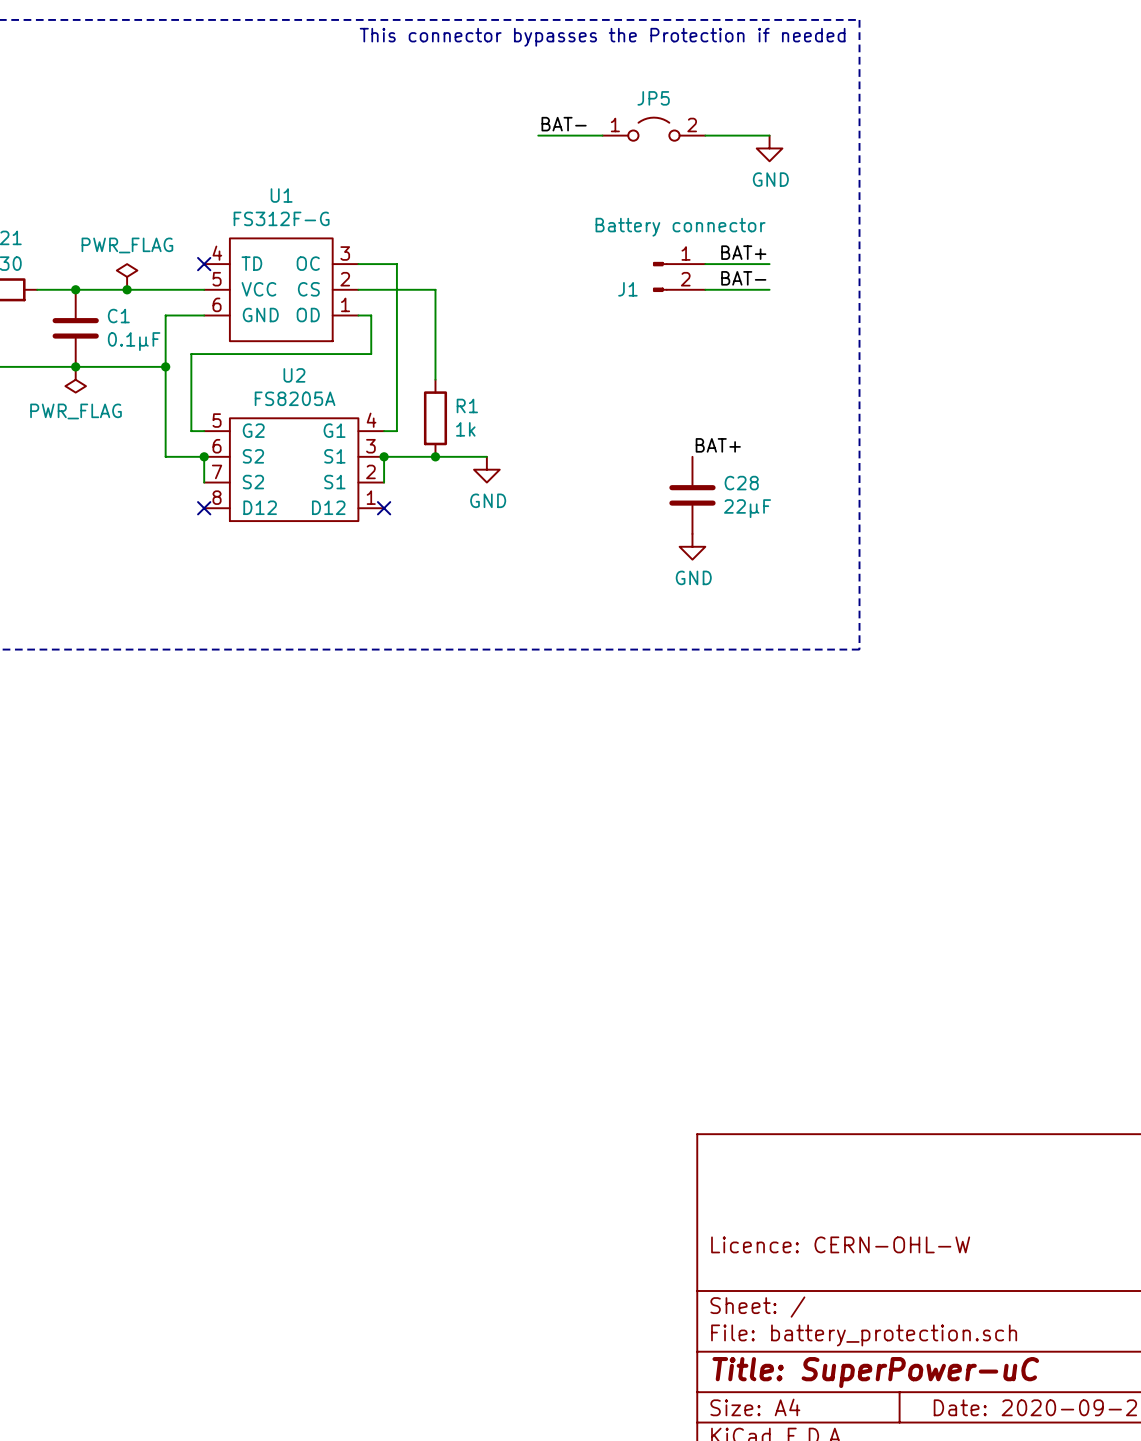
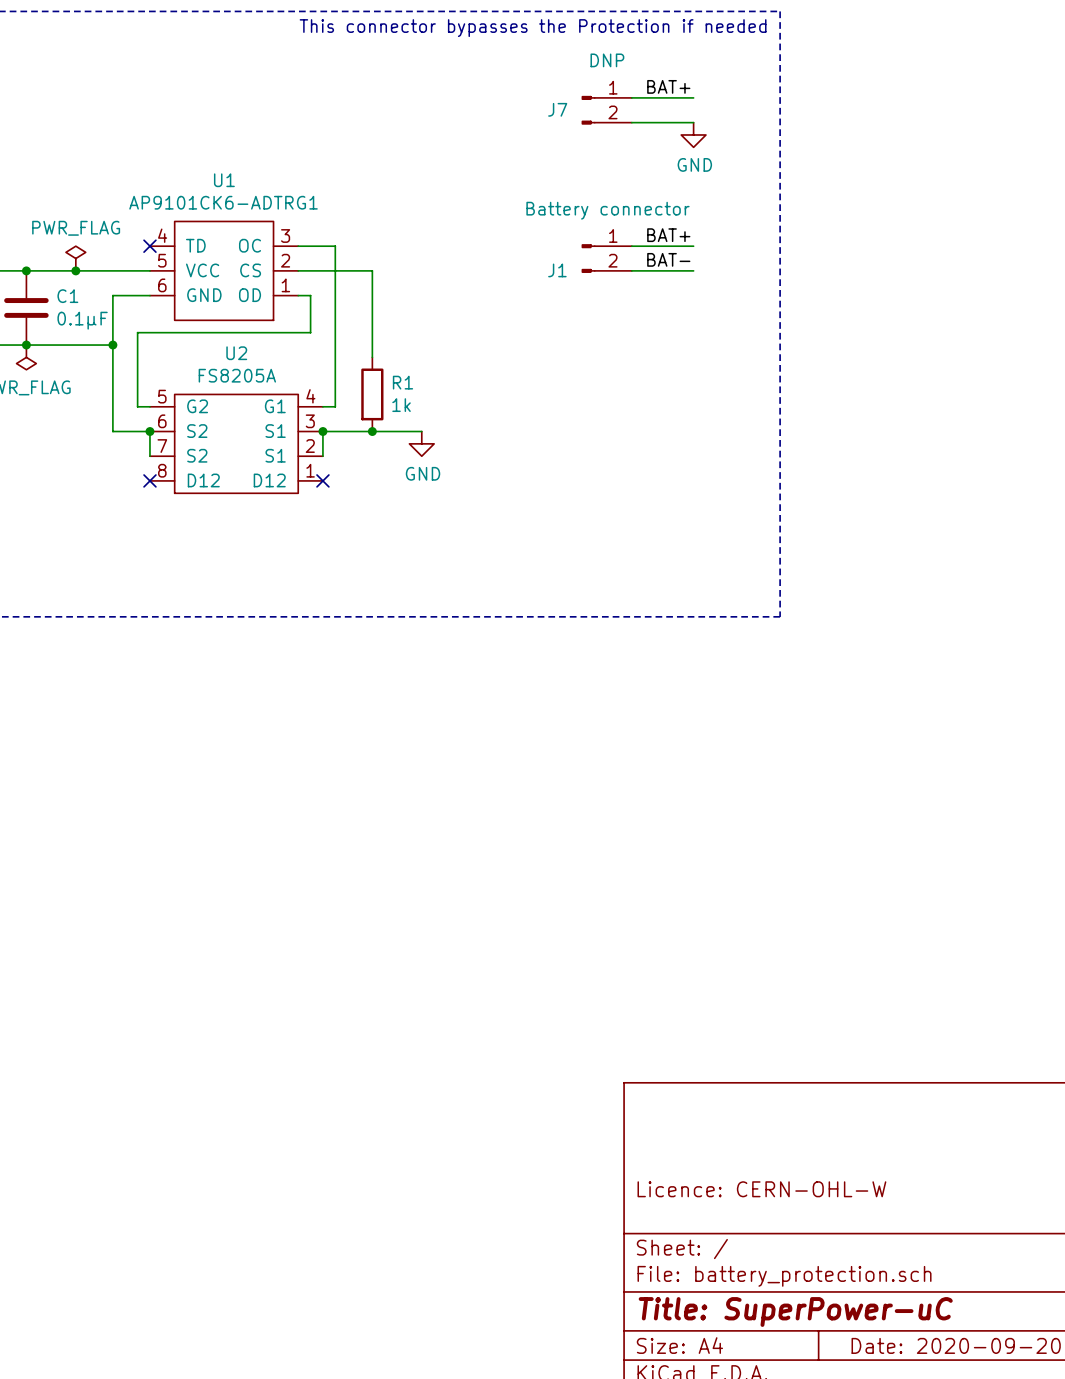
label: none -> BAT+ (668, 86)
J7: none -> DNP (606, 110)
label: BAT- (564, 124) -> none
JP5: (653, 129) -> none
wire: (538, 135) (602, 135) -> (631, 97) (693, 97)
U1 value: FS312F-G (281, 218) -> AP9101CK6-ADTRG1 (223, 202)
label: BAT+ (718, 445) -> none
C28: 22µF (692, 495) -> none
power symbol: GND (692, 546) -> none

